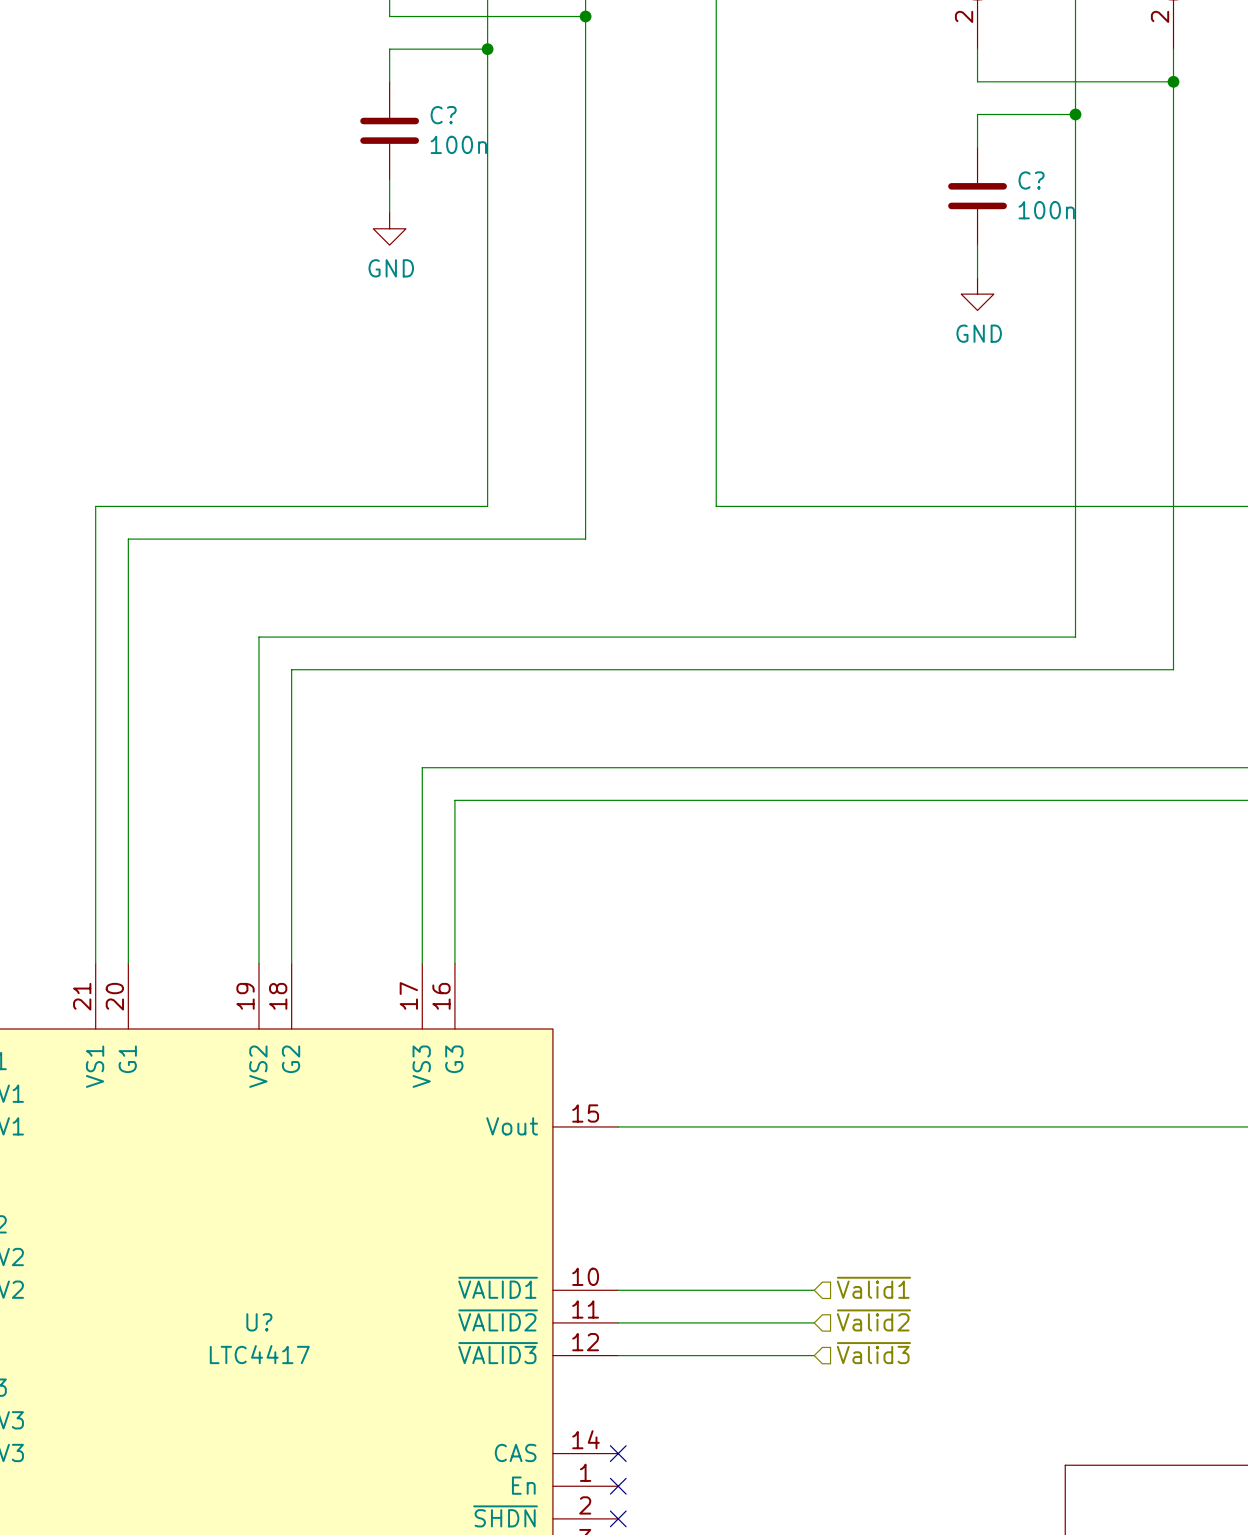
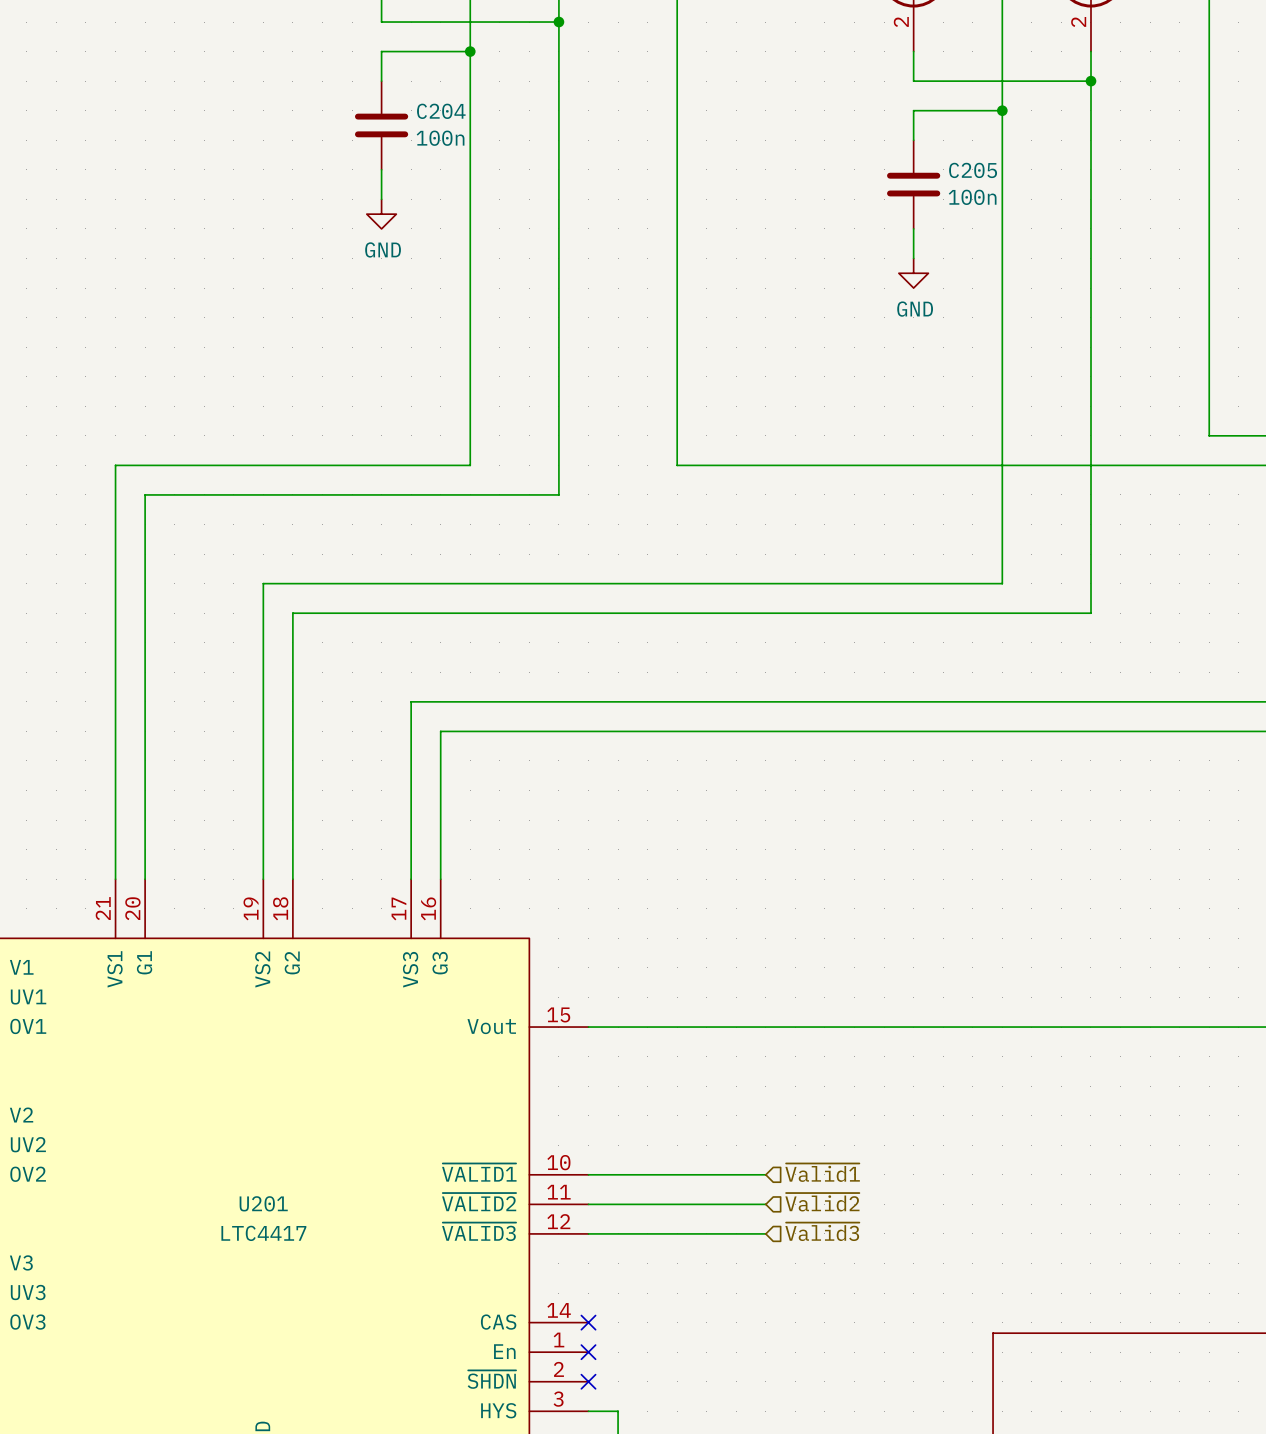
C? name: C? (443, 115) -> C204 (441, 111)
C? name: C? (1031, 180) -> C205 (973, 170)
U? name: U? (259, 1322) -> U201 (263, 1203)

